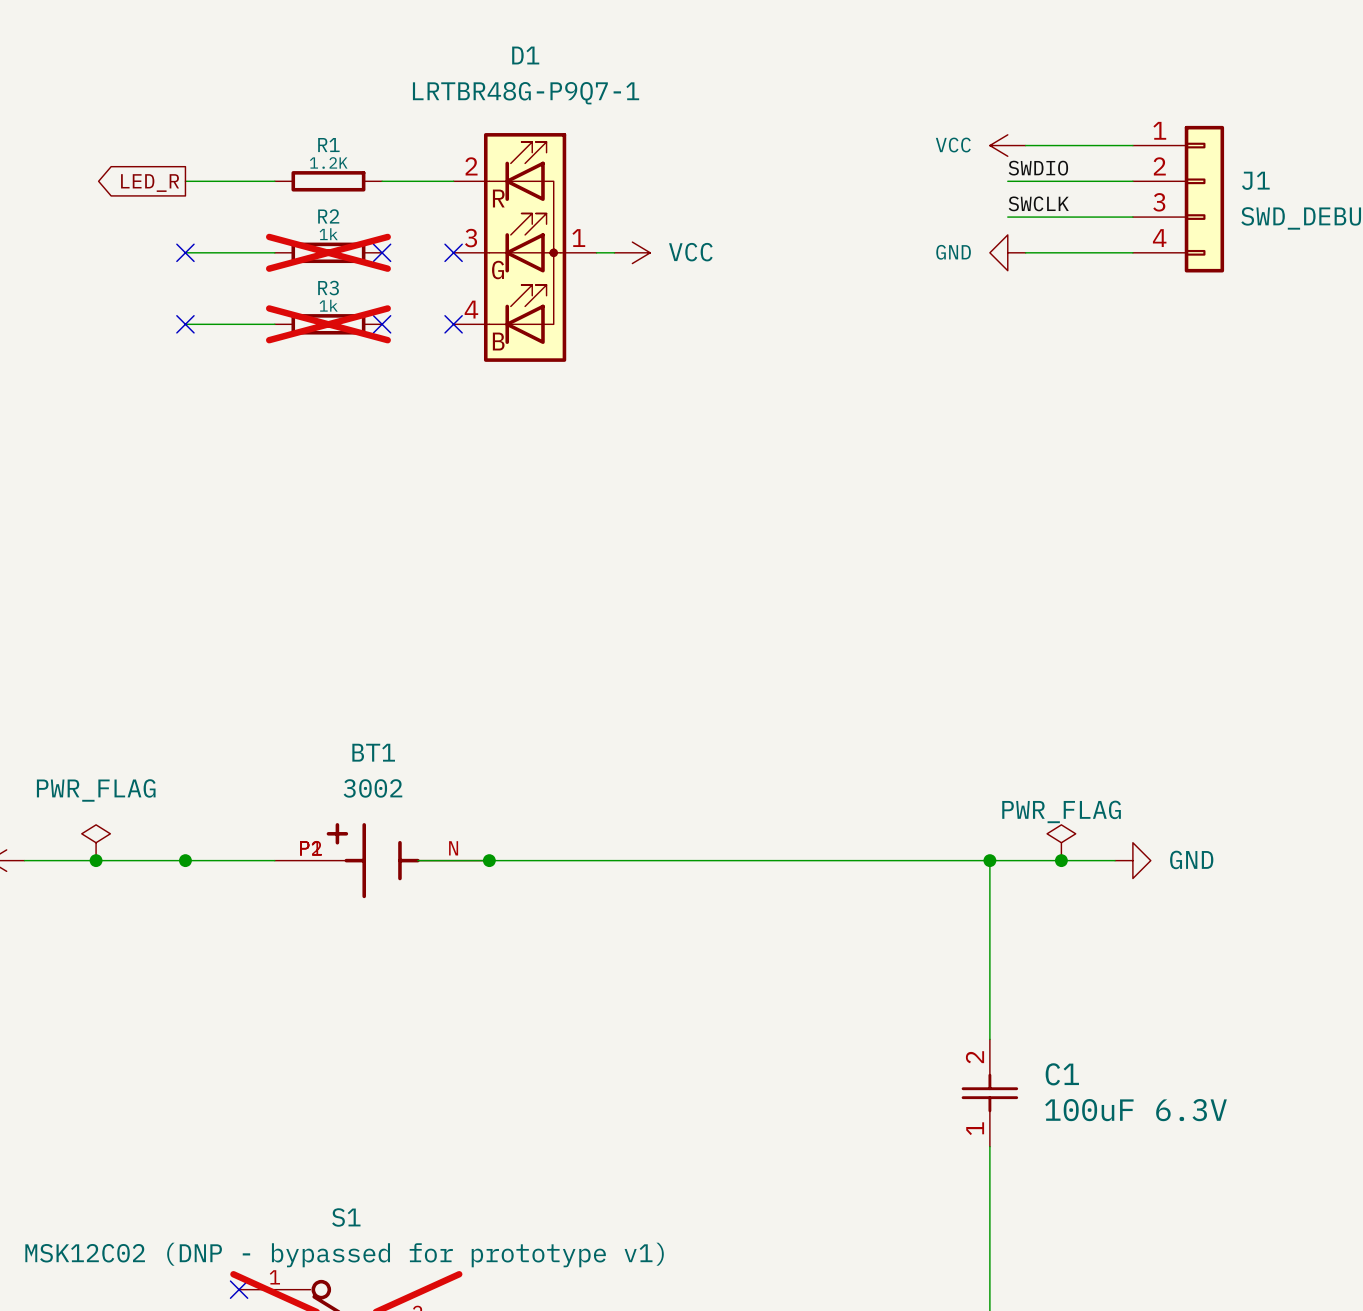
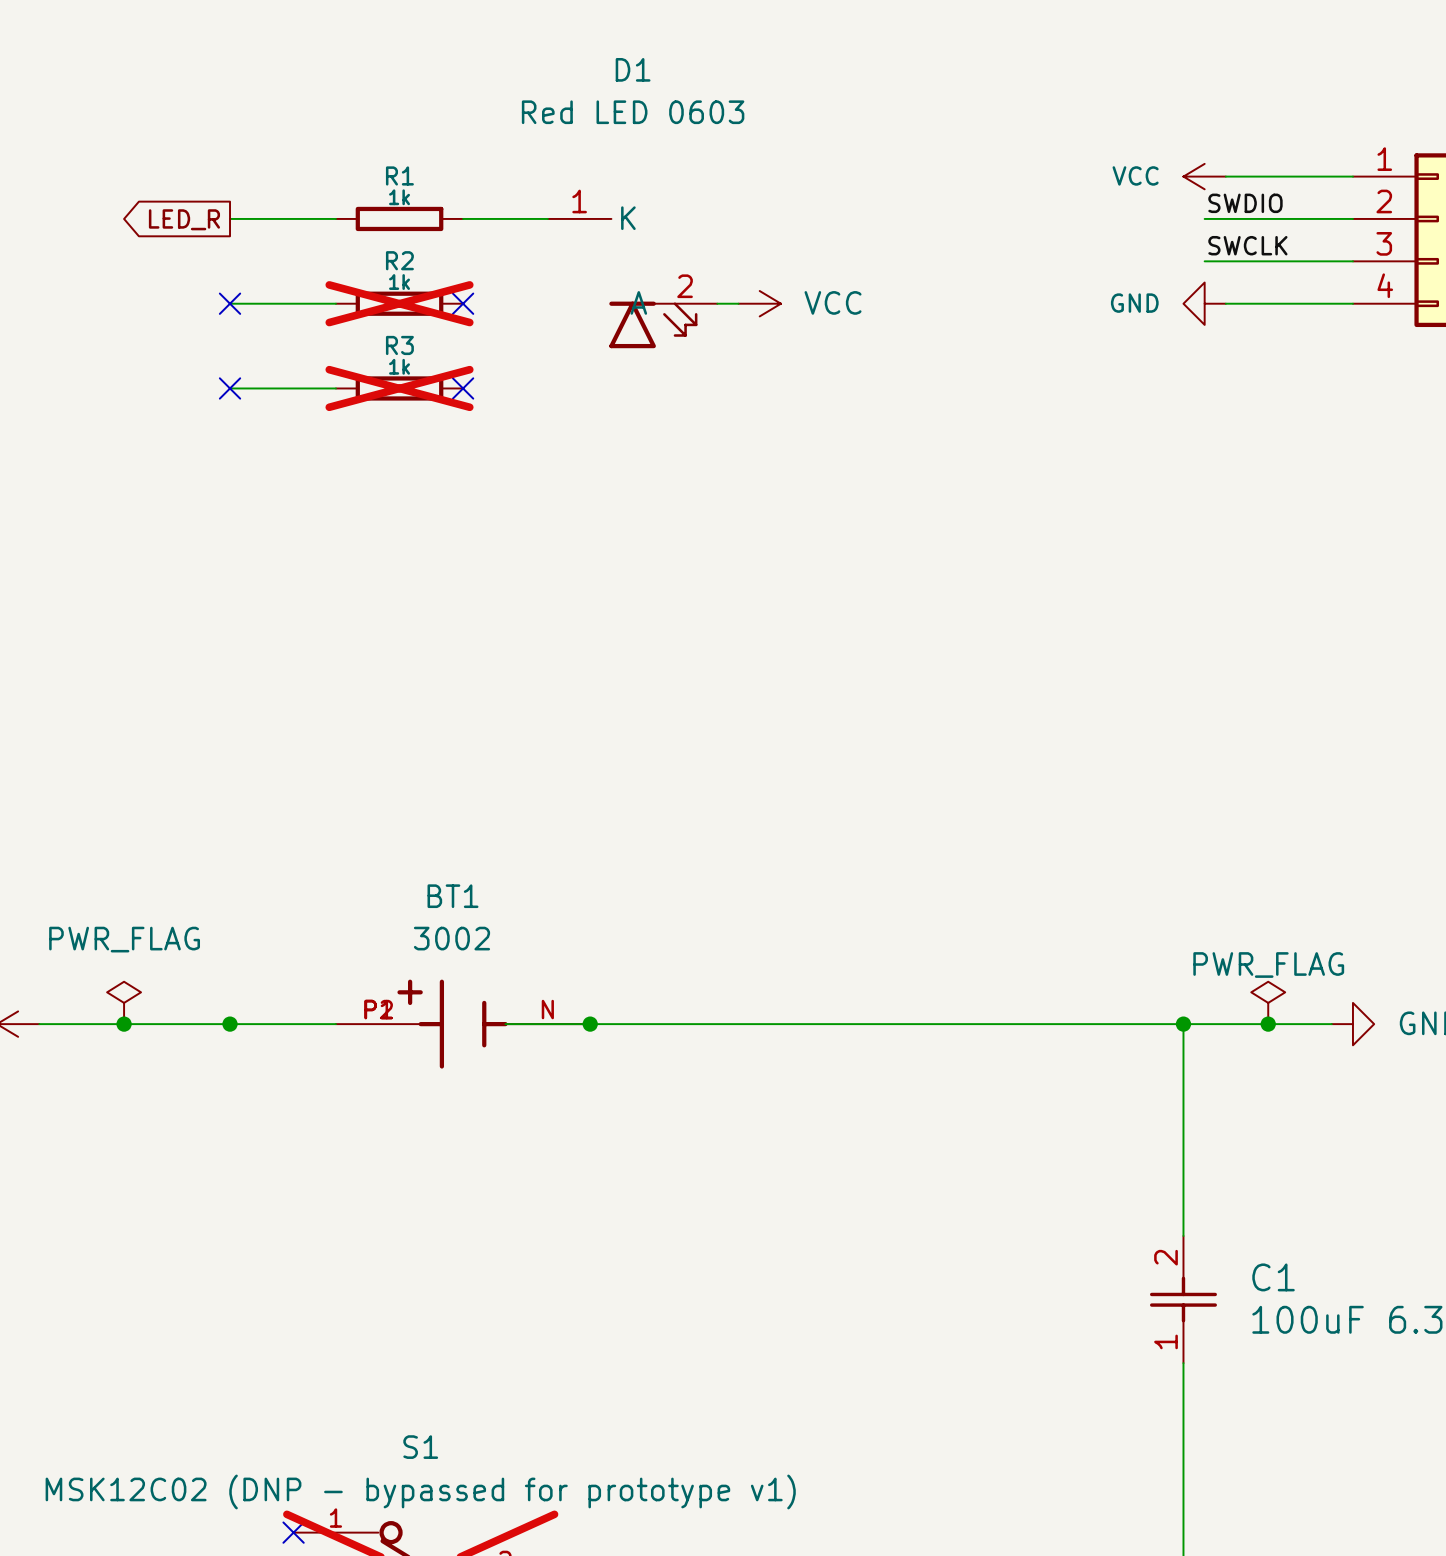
D1 value: LRTBR48G-P9Q7-1 (526, 93) -> Red LED 0603 (633, 112)
D1 symbol: [453, 133, 597, 362] -> [547, 218, 718, 349]
R1 value: 1.2K (328, 162) -> 1k (399, 197)
no-connect mark: (453, 252) -> none
no-connect mark: (453, 324) -> none

